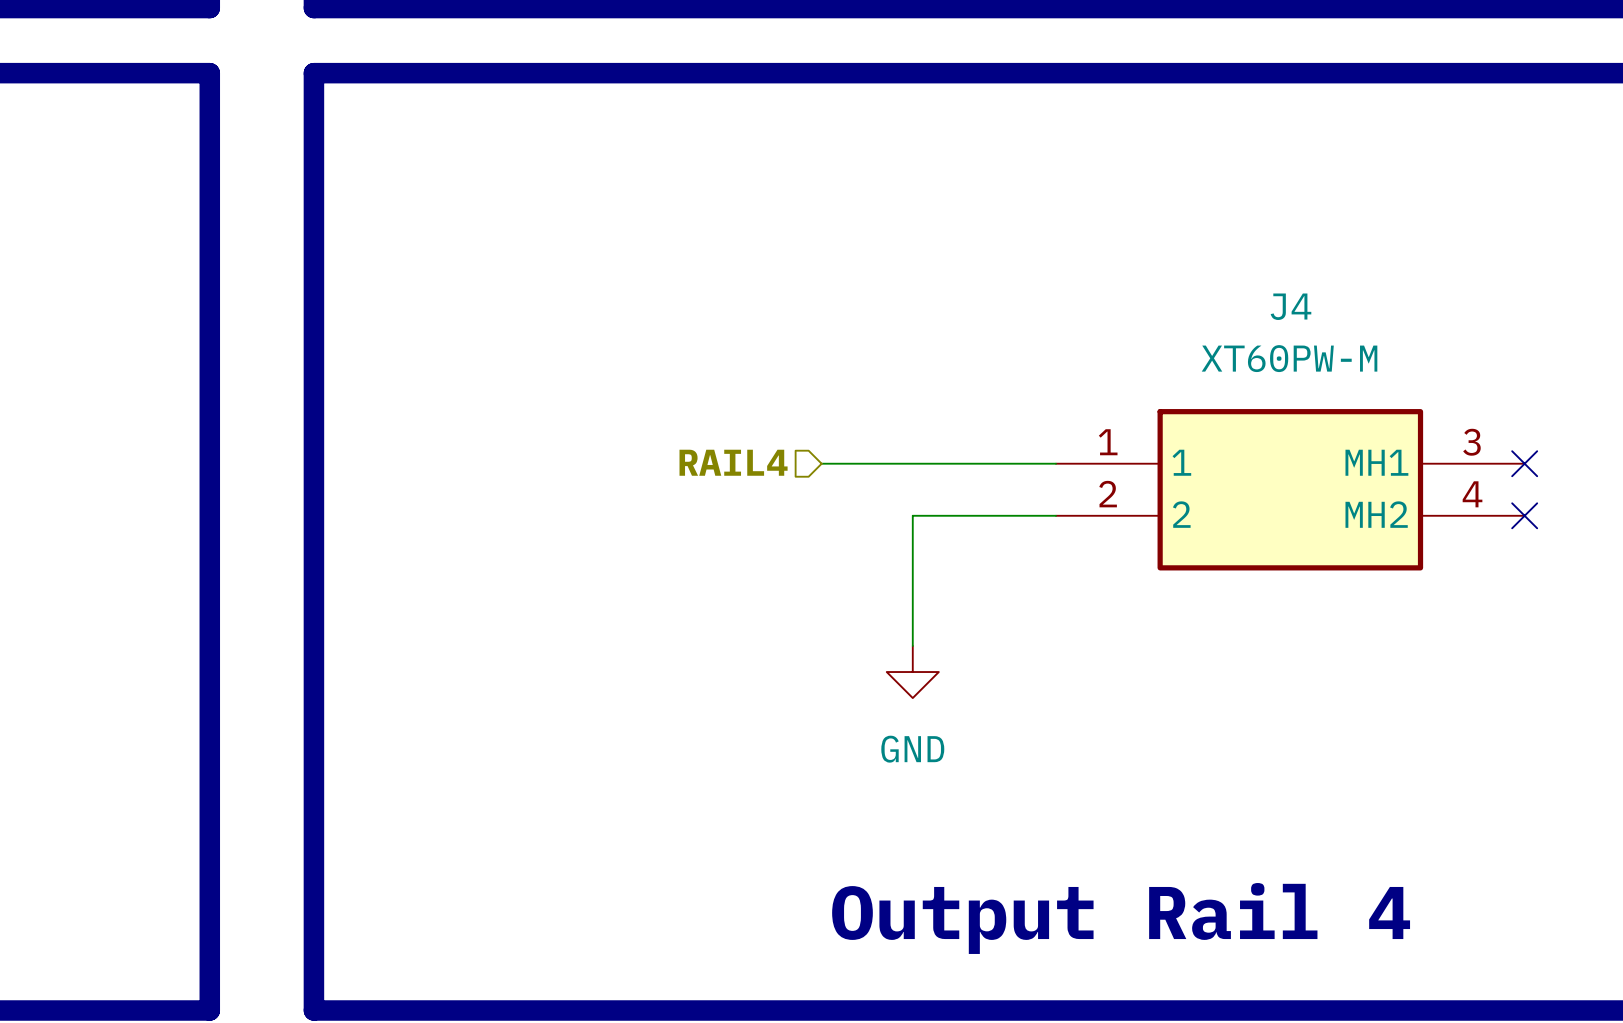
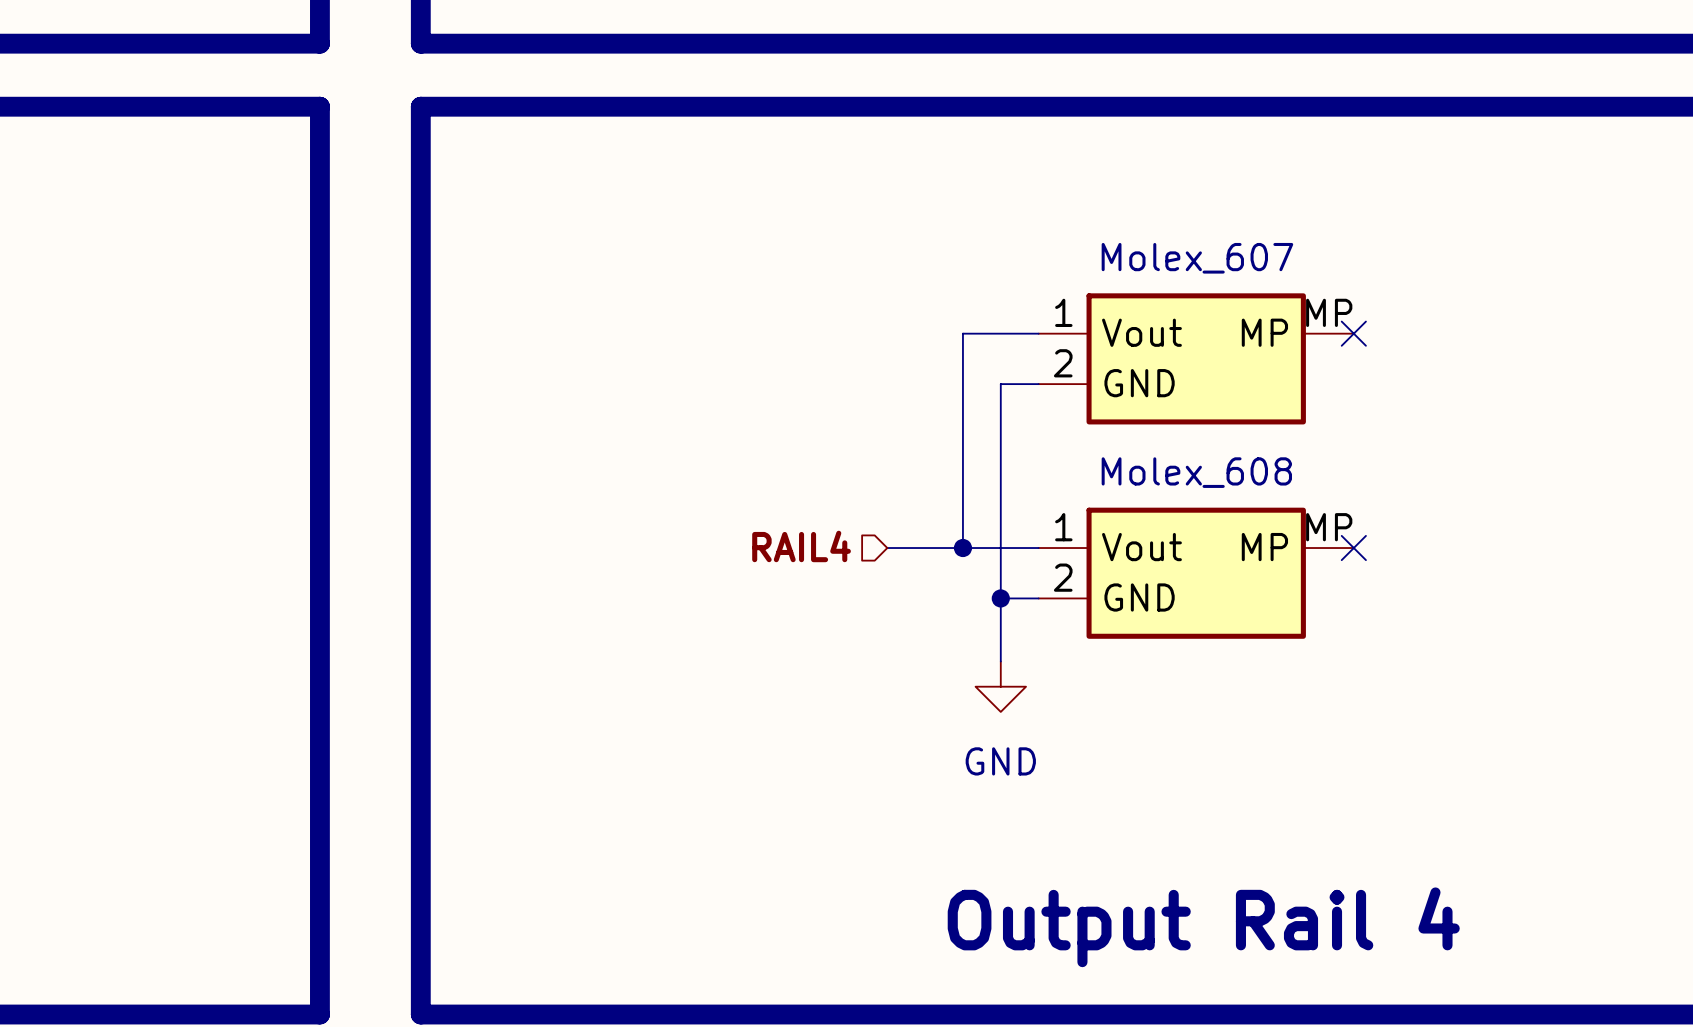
wire: none -> (1038, 333) (962, 333) (962, 548)
no-connect mark: none -> (1353, 333)
Molex_607: none -> (1196, 358)
hierarchical label position: RAIL4 (733, 462) -> RAIL4 (801, 546)
wire: (821, 463) (1055, 463) -> none
no-connect mark: (1524, 463) -> none
J4: XT60PW-M (1290, 489) -> none
wire: (912, 515) (1055, 515) -> (1000, 535) (1000, 384) (1038, 384)
no-connect mark: (1524, 515) -> none
wire: none -> (887, 548) (1038, 548)
junction: none -> (962, 548)
no-connect mark: none -> (1353, 548)
Molex_608: none -> (1196, 573)
wire: none -> (1000, 598) (1038, 598)
junction: none -> (1000, 598)

